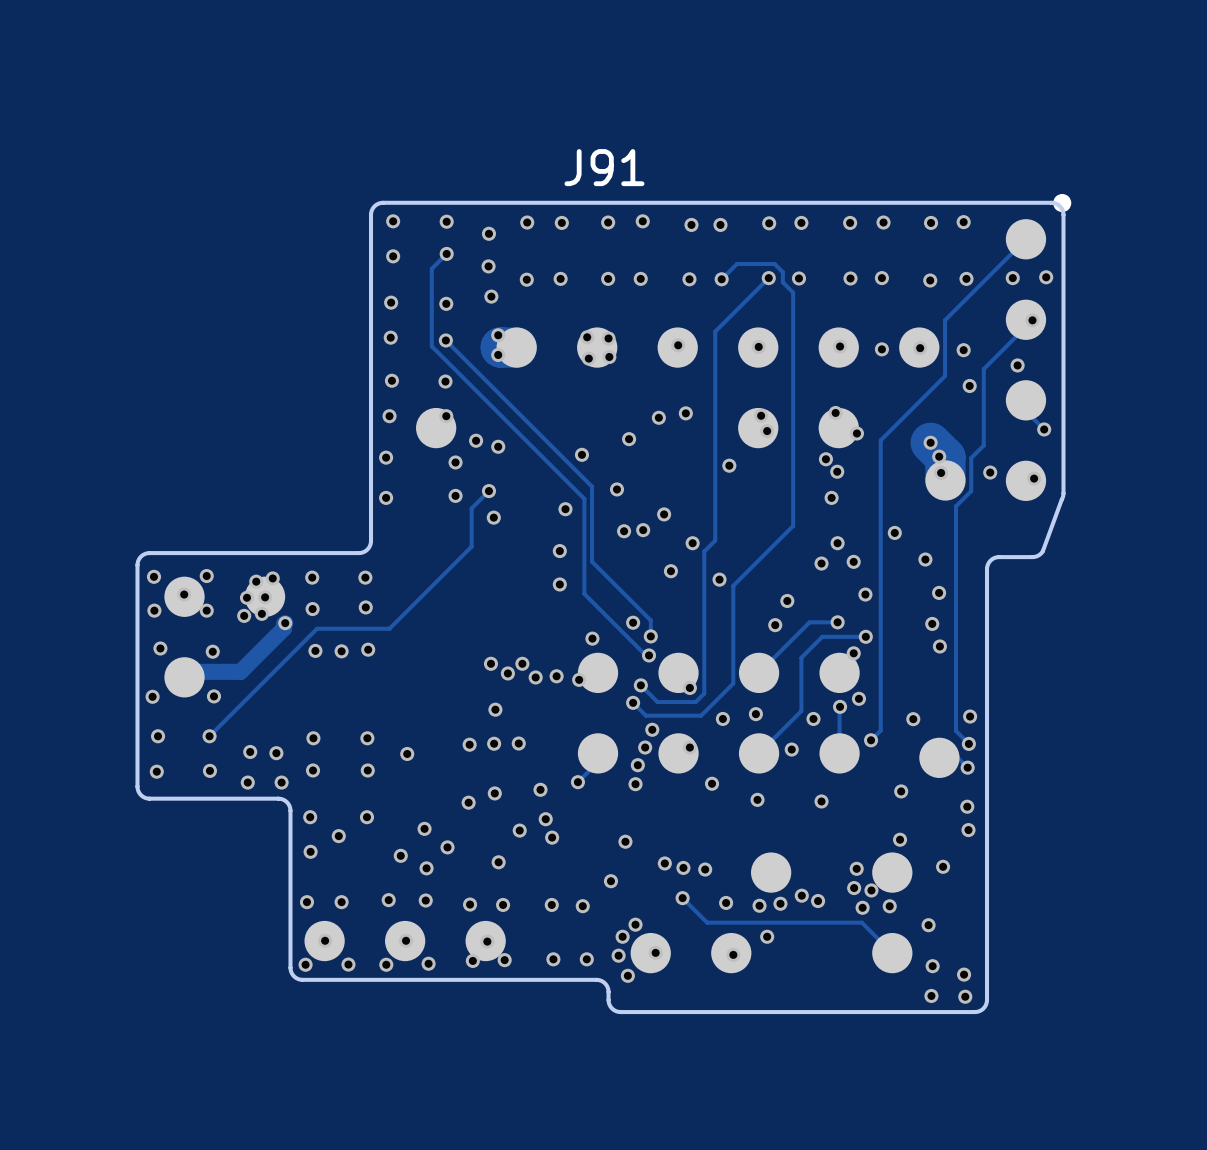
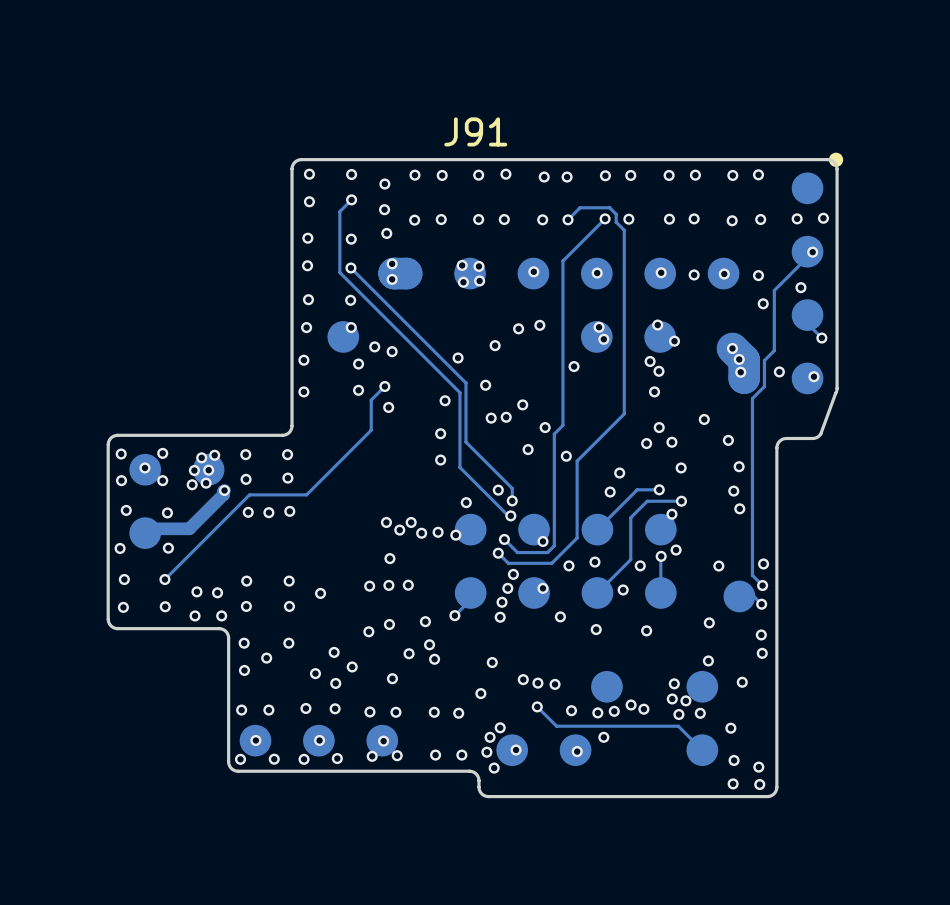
track: (1025, 239) (945, 320) (945, 376) (880, 440) (880, 730) (871, 740) -> none
via: (871, 740) -> none

